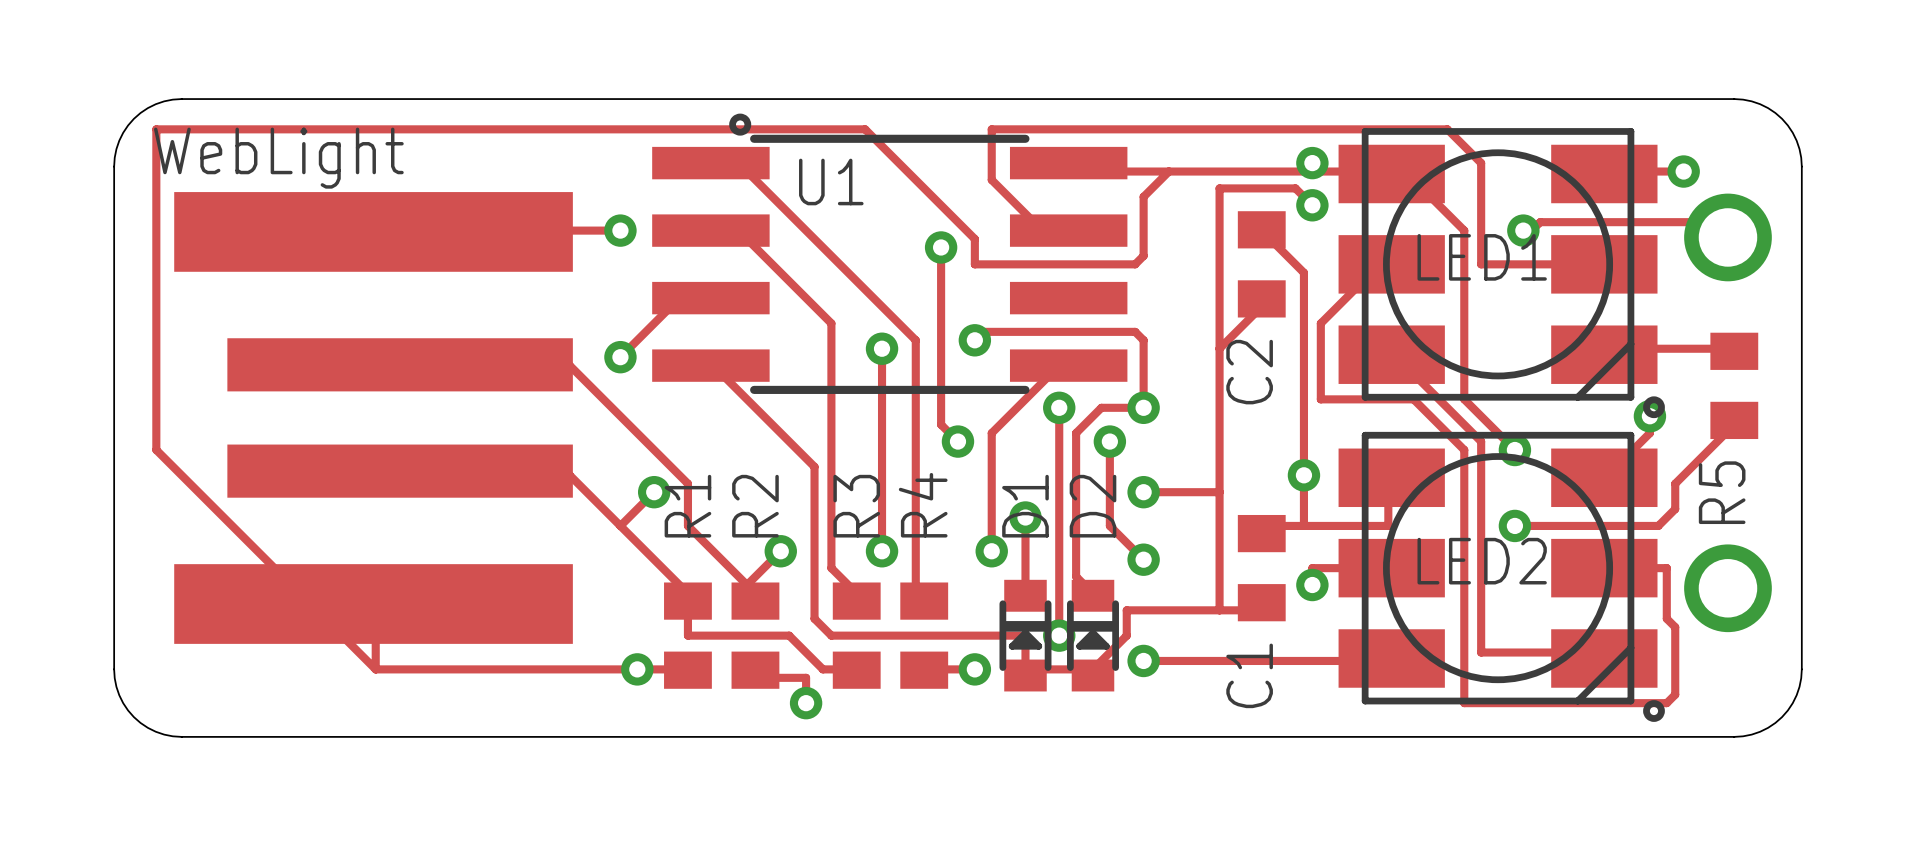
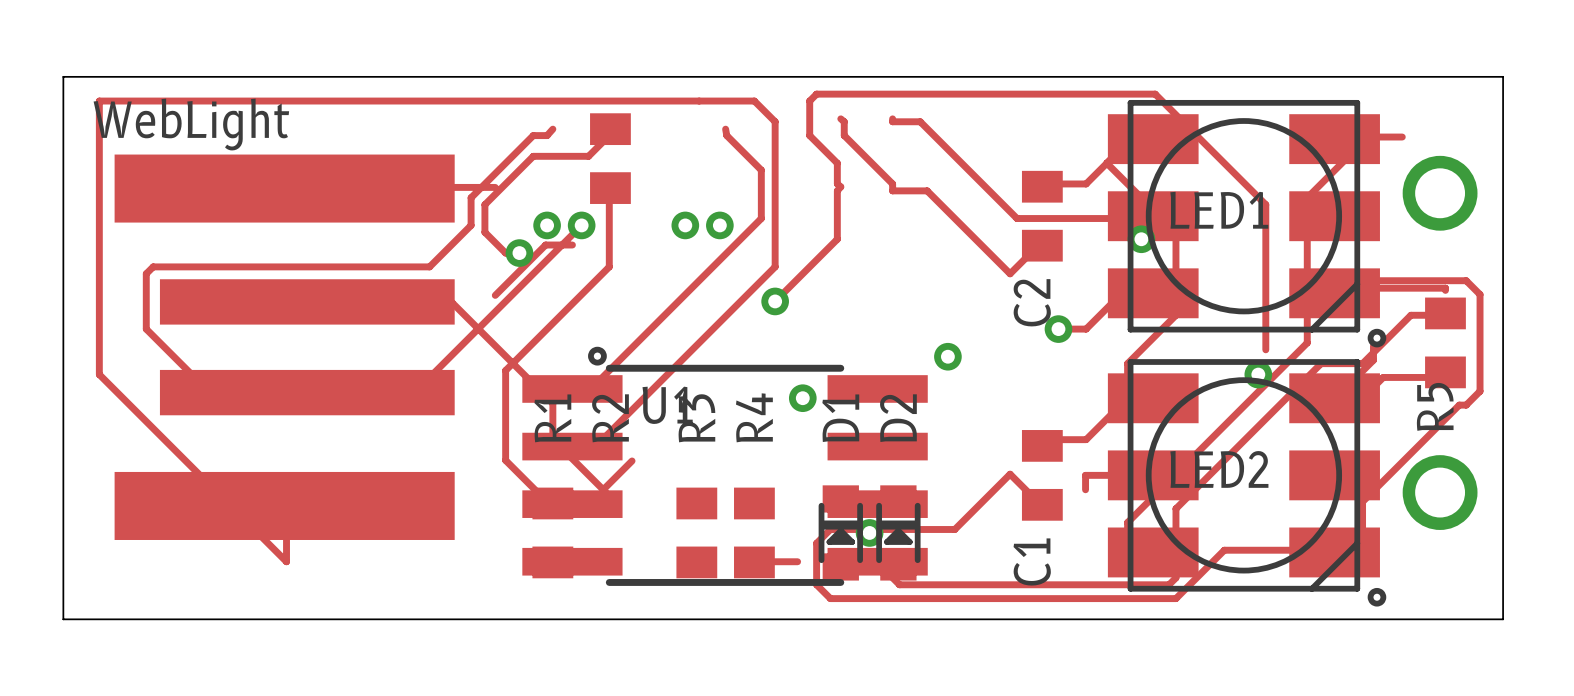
track: (865, 129) (974, 239) (974, 264) (1135, 264) (1143, 255) (1143, 196) (1168, 171) -> (704, 101) (754, 101) (775, 121) (775, 266) (595, 446) (572, 446)
track: none -> (892, 118) (892, 121) (920, 121) (1017, 218) (1120, 218) (1141, 239)
track: none -> (552, 129) (547, 135) (533, 135) (471, 197) (471, 225) (429, 266) (153, 266) (146, 273) (146, 329) (208, 391) (305, 391) (307, 394) (312, 391) (415, 391) (581, 225)
track: none -> (610, 129) (609, 135) (588, 156) (533, 156) (484, 204) (484, 232) (505, 253) (519, 253)
track: none -> (725, 129) (726, 135) (761, 170) (761, 218) (595, 384) (574, 384) (572, 388)
track: (710, 163) (738, 163) (915, 340) (915, 585) (924, 593) (924, 601) -> none
track: (1068, 163) (1076, 163) (1076, 171) (1388, 171) (1396, 179) (1413, 179) (1464, 230) (1464, 399) (1514, 450) -> none
via: (1312, 163) -> none
board edge: (114, 166) (119, 140) (133, 118) (155, 104) (181, 99) (1734, 99) (1760, 104) (1782, 118) (1796, 140) (1801, 166) -> (63, 132) (63, 76) (1503, 76) (1503, 132)
via: (1683, 171) -> none
track: none -> (1360, 143) (1307, 197) (1307, 342) (1127, 522) (1127, 547)
track: (1312, 205) (1295, 188) (1219, 188) (1219, 610) -> none
via: (1312, 205) -> none
via: (620, 230) -> none
track: (710, 230) (738, 230) (831, 323) (831, 568) (856, 593) (856, 601) -> none
track: (1068, 230) (1042, 230) (991, 179) (991, 129) (1447, 129) (1481, 163) (1481, 264) (1604, 264) -> none
track: (1261, 230) (1303, 272) (1303, 525) -> (1042, 186) (1044, 183) (1086, 183) (1120, 149) (1127, 143) (1106, 163) (1175, 232) (1175, 315) (1127, 363) (1127, 402) (1120, 405) (1086, 439) (1044, 439) (1042, 445)
track: (1523, 230) (1531, 230) (1540, 222) (1725, 222) (1727, 237) -> none
via: (1523, 230) -> none
track: none -> (610, 188) (609, 266) (505, 370) (505, 460) (547, 501) (567, 501) (572, 504)
track: (941, 247) (941, 424) (957, 441) -> none
via: (941, 247) -> none
U1 position: (889, 253) -> (725, 466)
track: (1391, 264) (1379, 264) (1320, 323) (1320, 399) (1413, 399) (1464, 450) (1464, 703) (1666, 703) (1675, 694) (1675, 627) (1666, 618) (1666, 568) (1604, 568) -> none
via: none -> (547, 225)
via: none -> (581, 225)
via: none -> (685, 225)
via: none -> (719, 225)
via: none -> (1141, 239)
track: (1261, 298) (1261, 306) (1219, 348) -> (1042, 245) (1037, 246) (1010, 273) (927, 190) (892, 190) (892, 183) (844, 135) (844, 121) (840, 118)
via: none -> (519, 253)
track: (974, 340) (974, 331) (1135, 331) (1143, 340) (1143, 407) (1101, 407) (1076, 433) (1076, 576) (1092, 593) (1092, 595) -> none
via position: (974, 340) -> (775, 301)
track: (882, 348) (882, 551) -> none
via: (882, 348) -> none
track: none -> (1127, 288) (1086, 329) (1058, 329)
track: (1391, 354) (1396, 357) (1481, 441) (1481, 652) (1599, 652) (1604, 658) -> none
via: (620, 357) -> none
track: none -> (775, 301) (837, 239) (837, 190) (840, 186) (837, 183) (837, 163) (809, 135) (809, 101) (816, 94) (1155, 94) (1265, 204) (1265, 349)
track: (710, 365) (713, 365) (814, 466) (814, 618) (831, 635) (1025, 635) (1025, 675) -> none
track: (1068, 365) (1059, 365) (991, 433) (991, 551) -> none
track: none -> (1445, 313) (1445, 315) (1410, 315) (1362, 363) (1321, 363) (1175, 508) (1175, 577) (1169, 584) (899, 584) (877, 561)
R5 position: (1734, 385) -> (1445, 342)
via: none -> (1058, 329)
track: (1059, 407) (1059, 635) -> none
via: (1059, 407) -> none
via position: (1143, 407) -> (947, 356)
via: (1649, 416) -> none
track: (1734, 420) (1734, 424) (1675, 483) (1675, 509) (1658, 525) (1514, 525) -> none
via: (957, 441) -> none
track: (1109, 441) (1109, 525) (1143, 559) -> none
via: (1109, 441) -> none
track: none -> (1445, 372) (1445, 377) (1383, 377) (1362, 398) (1360, 402)
track: (400, 471) (401, 475) (569, 475) (687, 593) (687, 635) (789, 635) (822, 669) (856, 669) -> none
via: (1303, 475) -> none
via: none -> (802, 398)
track: (1391, 477) (1388, 483) (1388, 525) (1261, 525) (1261, 533) -> none
track: (654, 492) (620, 525) -> none
via: (654, 492) -> none
track: (1143, 492) (1219, 492) -> none
via: (1143, 492) -> none
track: (1025, 517) (1025, 595) -> none
via: (1025, 517) -> none
via: (1514, 525) -> none
via: (780, 551) -> none
via: (882, 551) -> none
via: (991, 551) -> none
via: (1143, 559) -> none
via: (1312, 585) -> none
track: (1261, 602) (1261, 610) (1126, 610) (1126, 635) (1092, 669) (1092, 675) -> (1042, 504) (1010, 474) (954, 529) (830, 529) (816, 543) (816, 584) (830, 598) (1175, 598) (1224, 550) (1355, 550) (1360, 547) (1362, 543) (1362, 501) (1459, 405) (1466, 405) (1480, 391) (1480, 294) (1466, 280) (1369, 280) (1360, 288)
R2 position: (755, 635) -> (610, 158)
track: (1391, 658) (1388, 660) (1143, 660) -> none
via: (1143, 660) -> none
board edge: (114, 669) (119, 695) (133, 717) (155, 731) (181, 736) -> (63, 561) (63, 619) (120, 619)
track: (375, 669) (687, 669) -> none
via: (637, 669) -> none
via: (974, 669) -> none
board edge: (1801, 669) (1796, 695) (1782, 717) (1760, 731) (1734, 736) -> (1503, 561) (1503, 619) (1445, 619)
track: (755, 670) (755, 677) (806, 677) (806, 703) -> none
via: (806, 703) -> none

